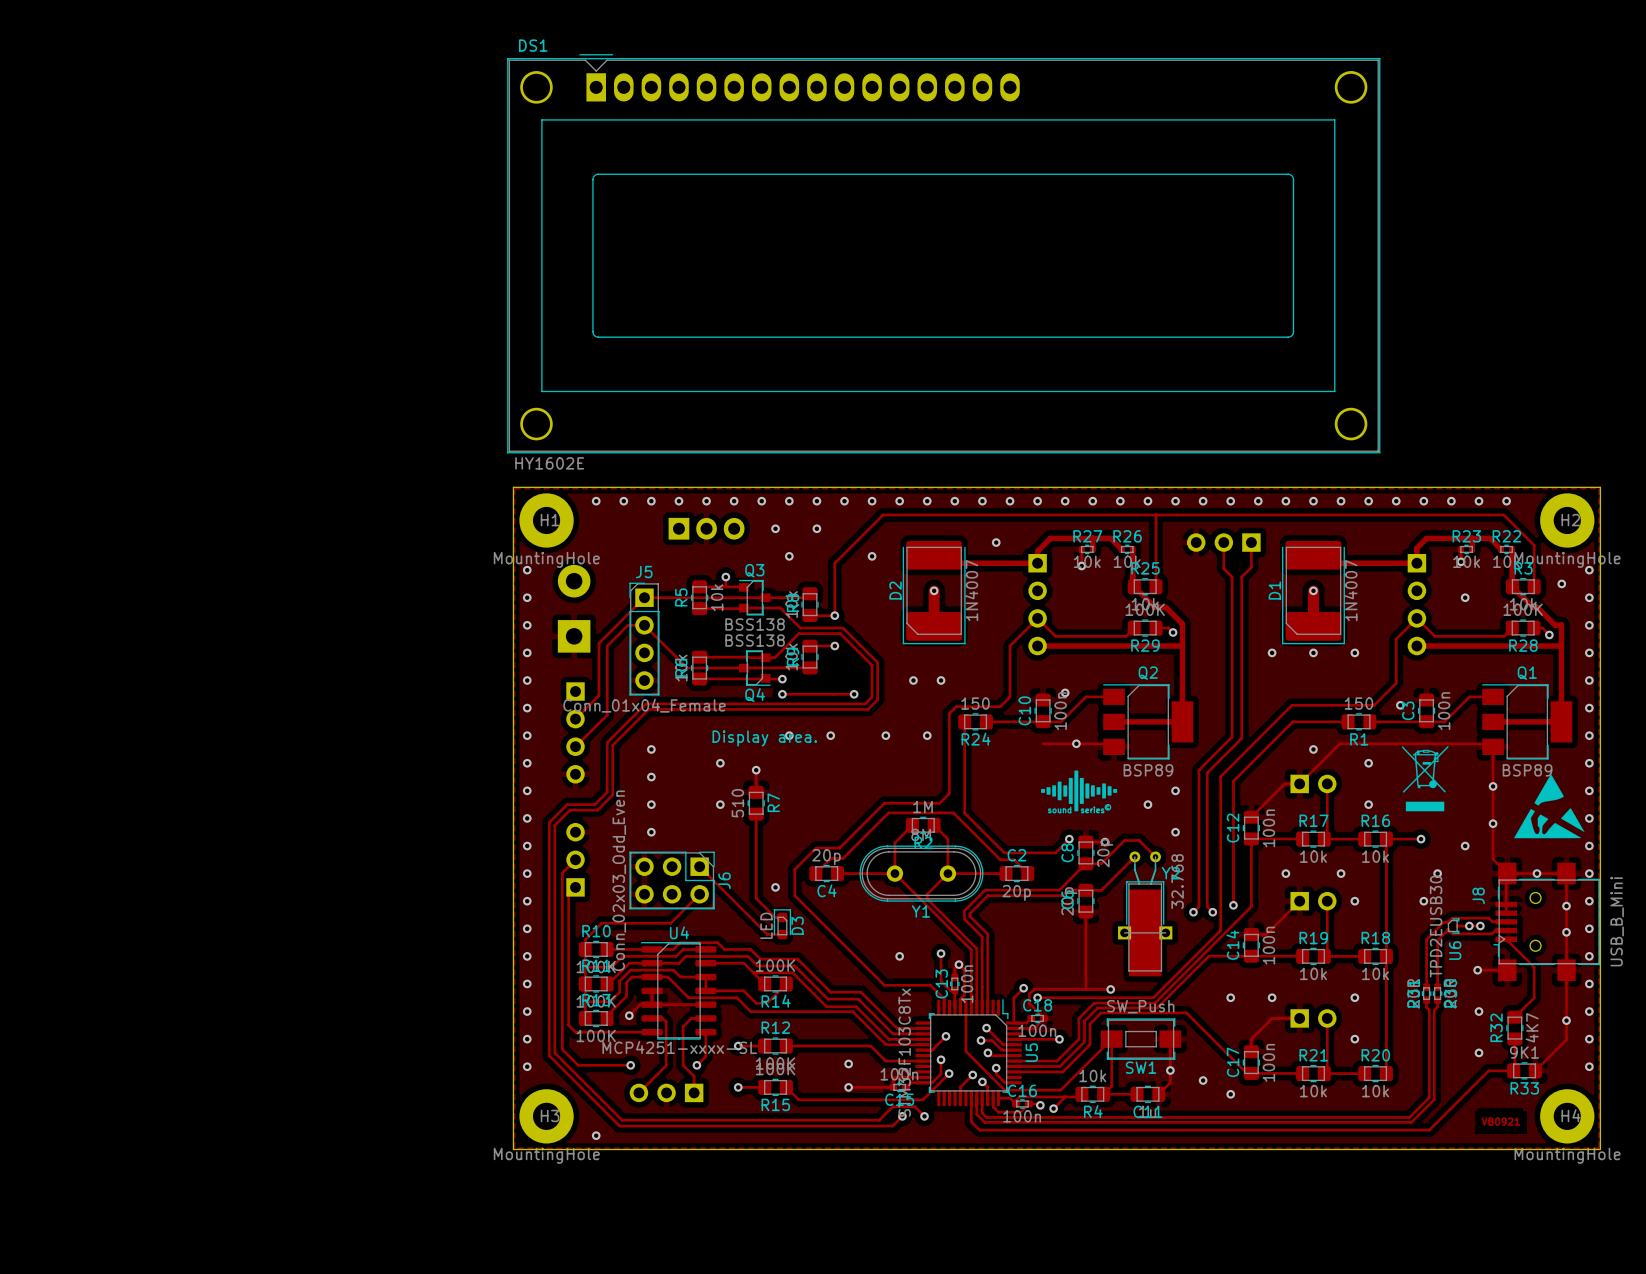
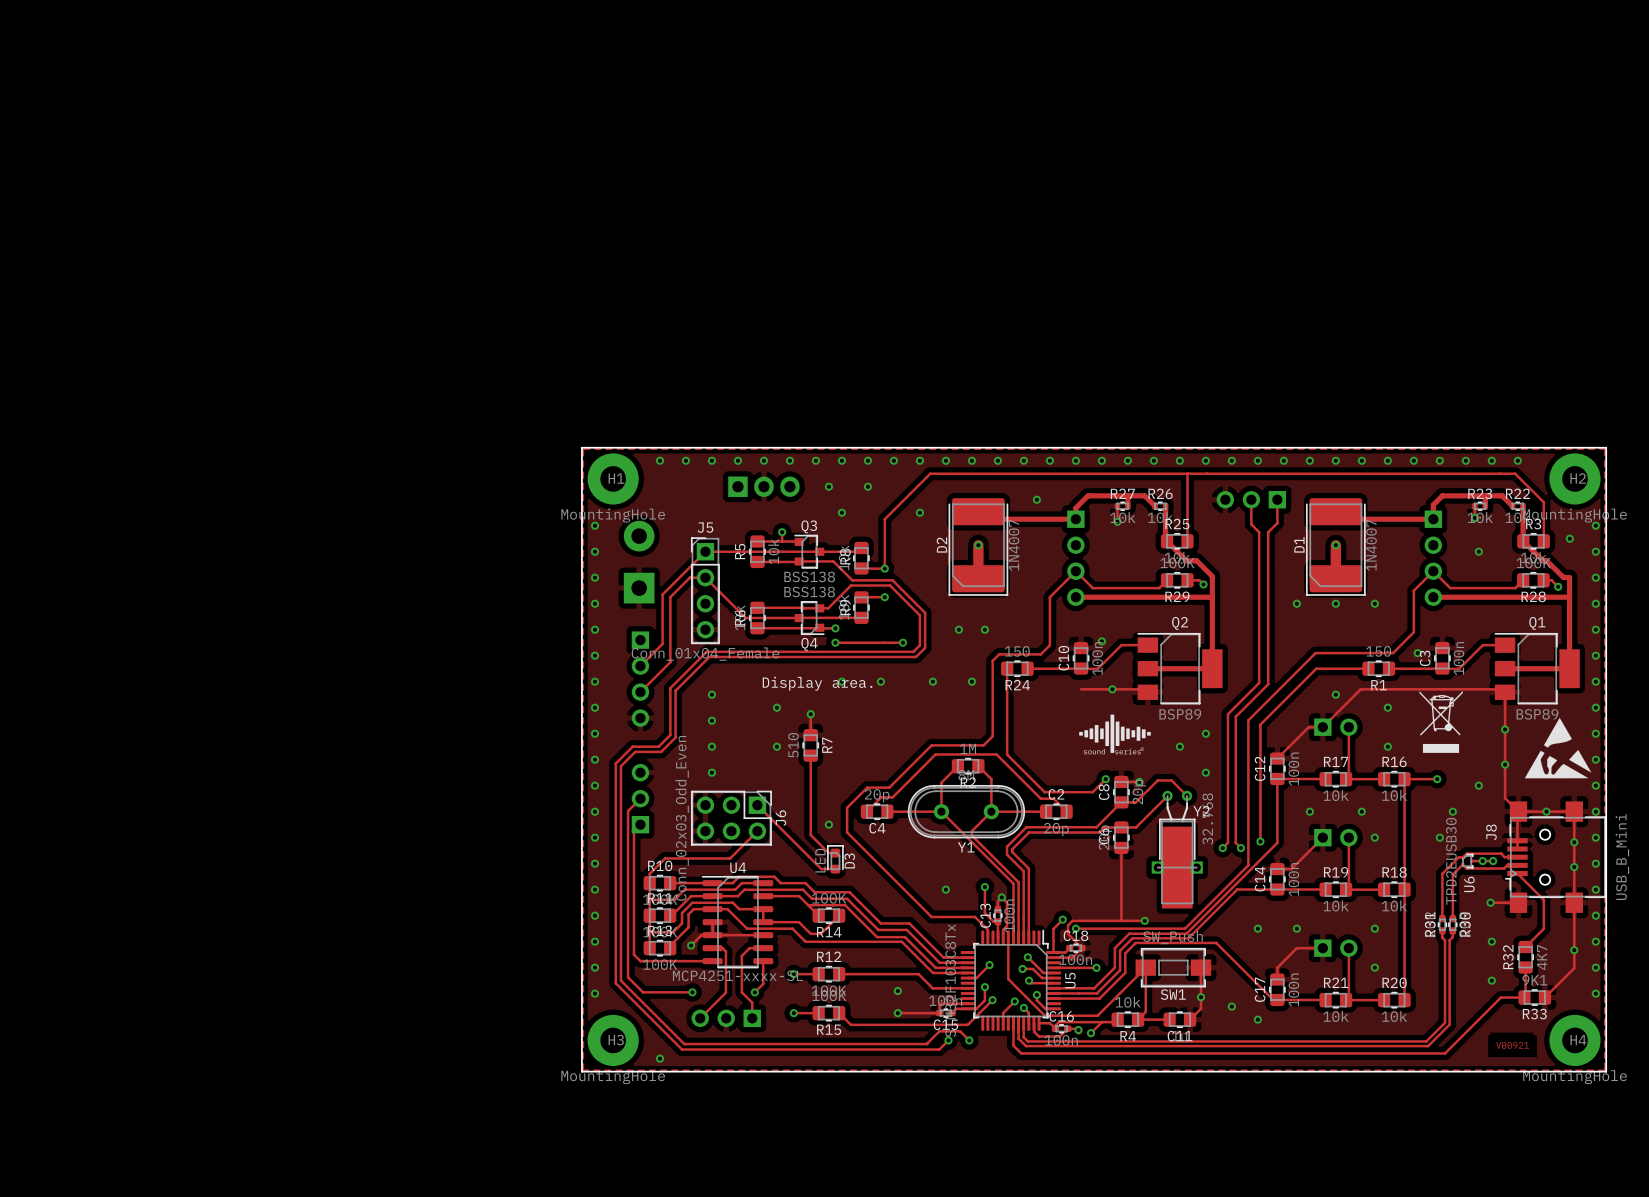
DS1: HY1602E (943, 253) -> none

